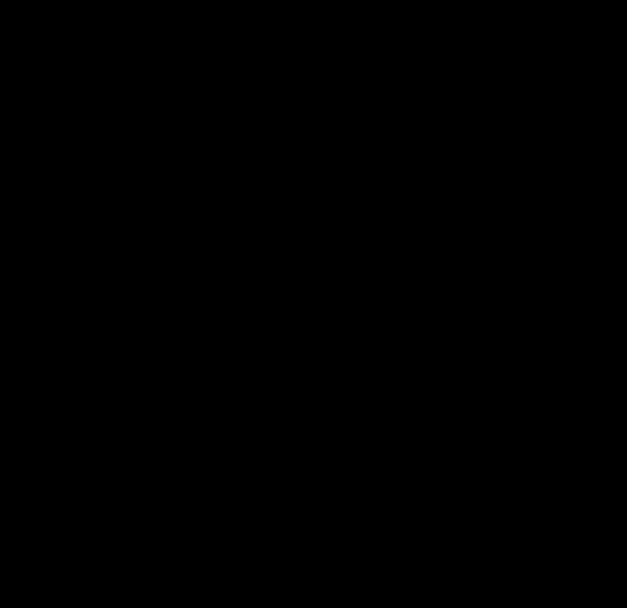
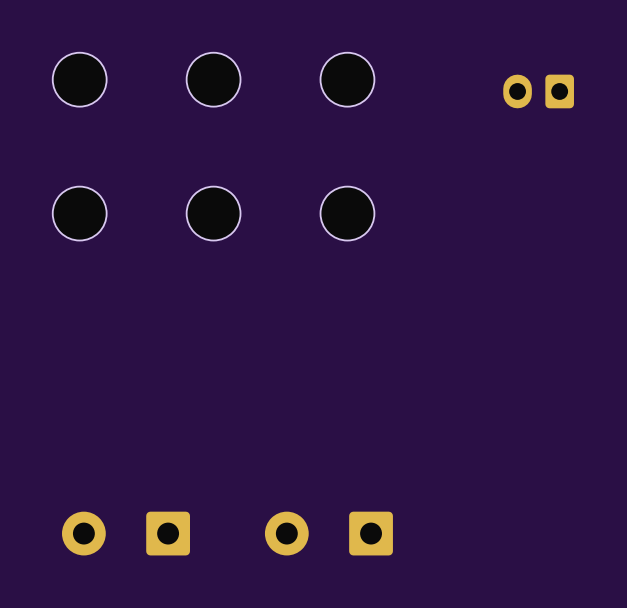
part: none -> (79, 79)
part: none -> (213, 79)
part: none -> (347, 79)
part: none -> (538, 91)
part: none -> (79, 213)
part: none -> (213, 213)
part: none -> (347, 213)
part: none -> (126, 533)
part: none -> (328, 533)

